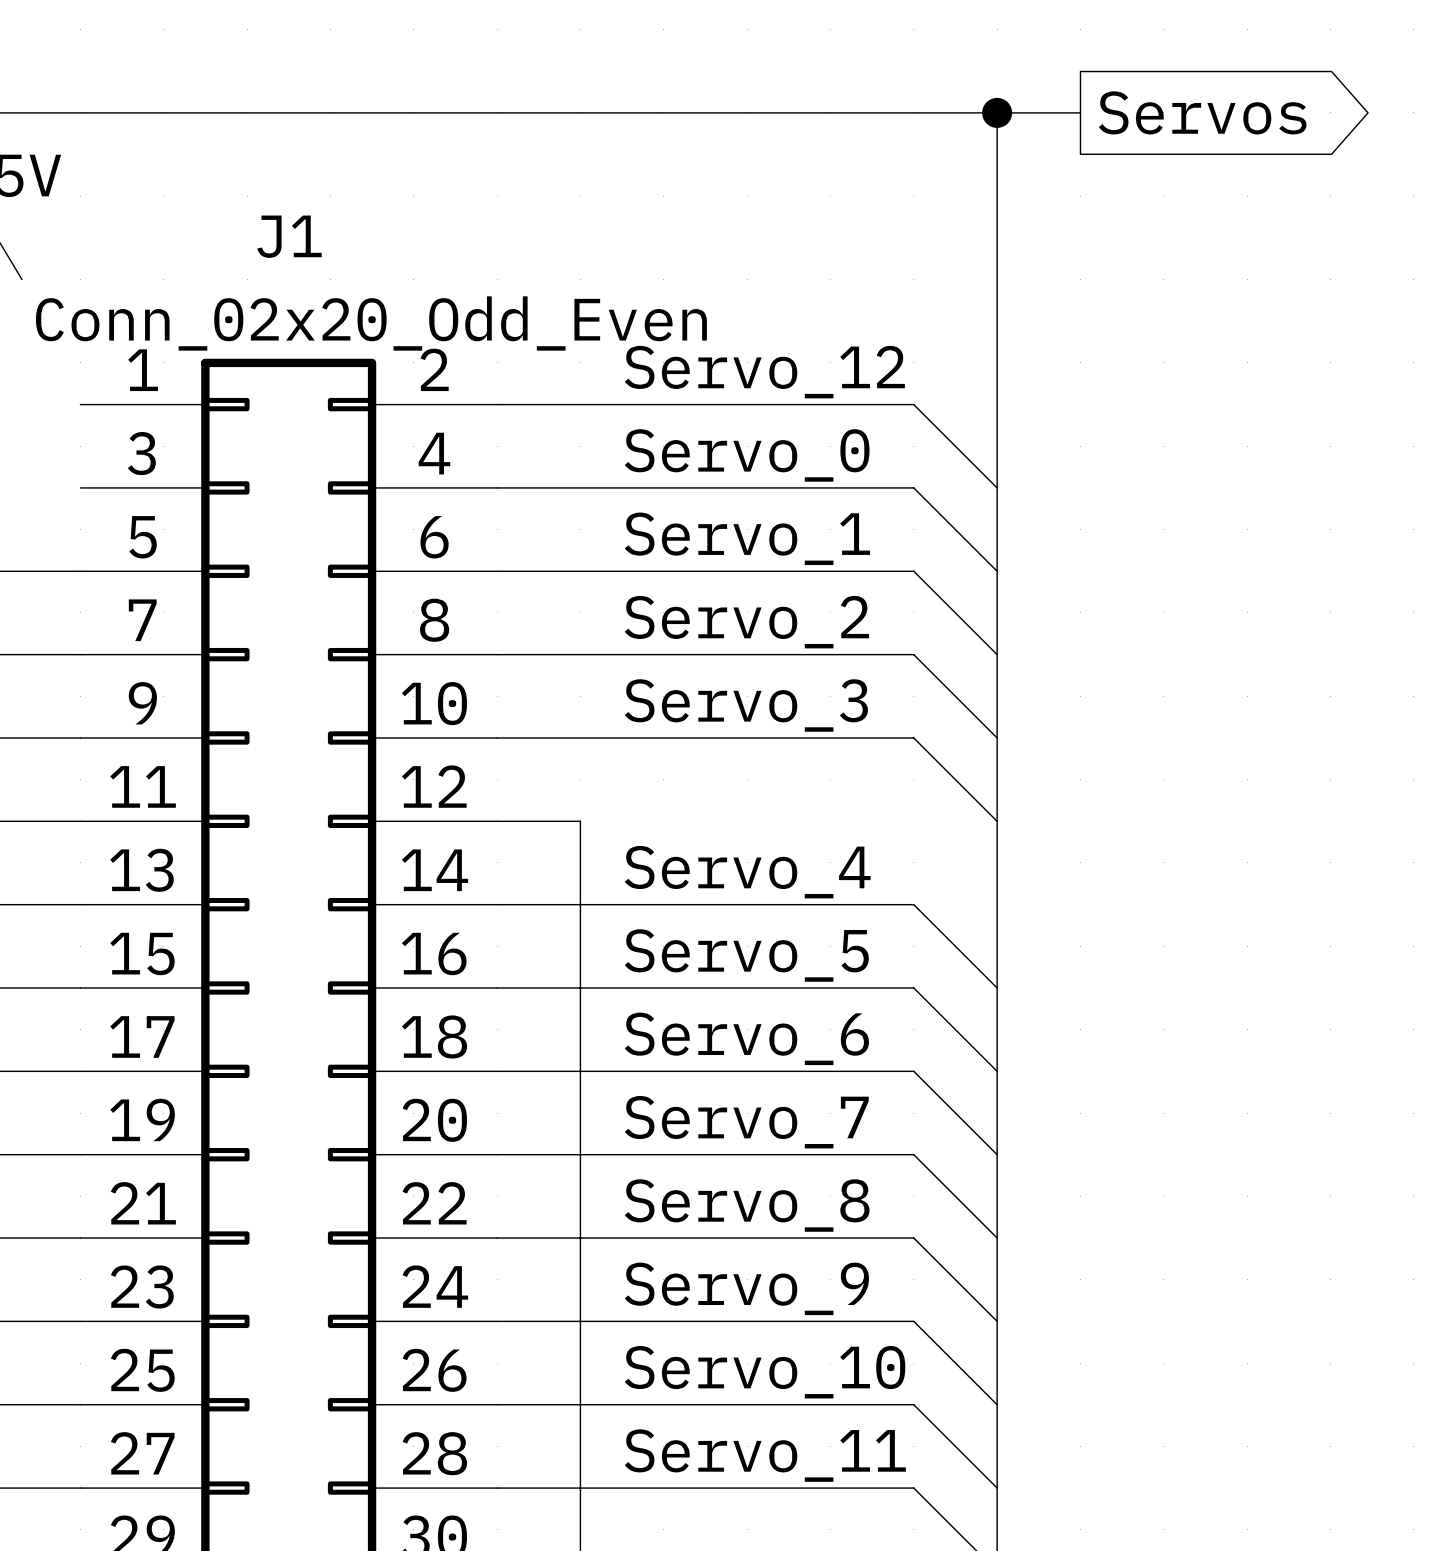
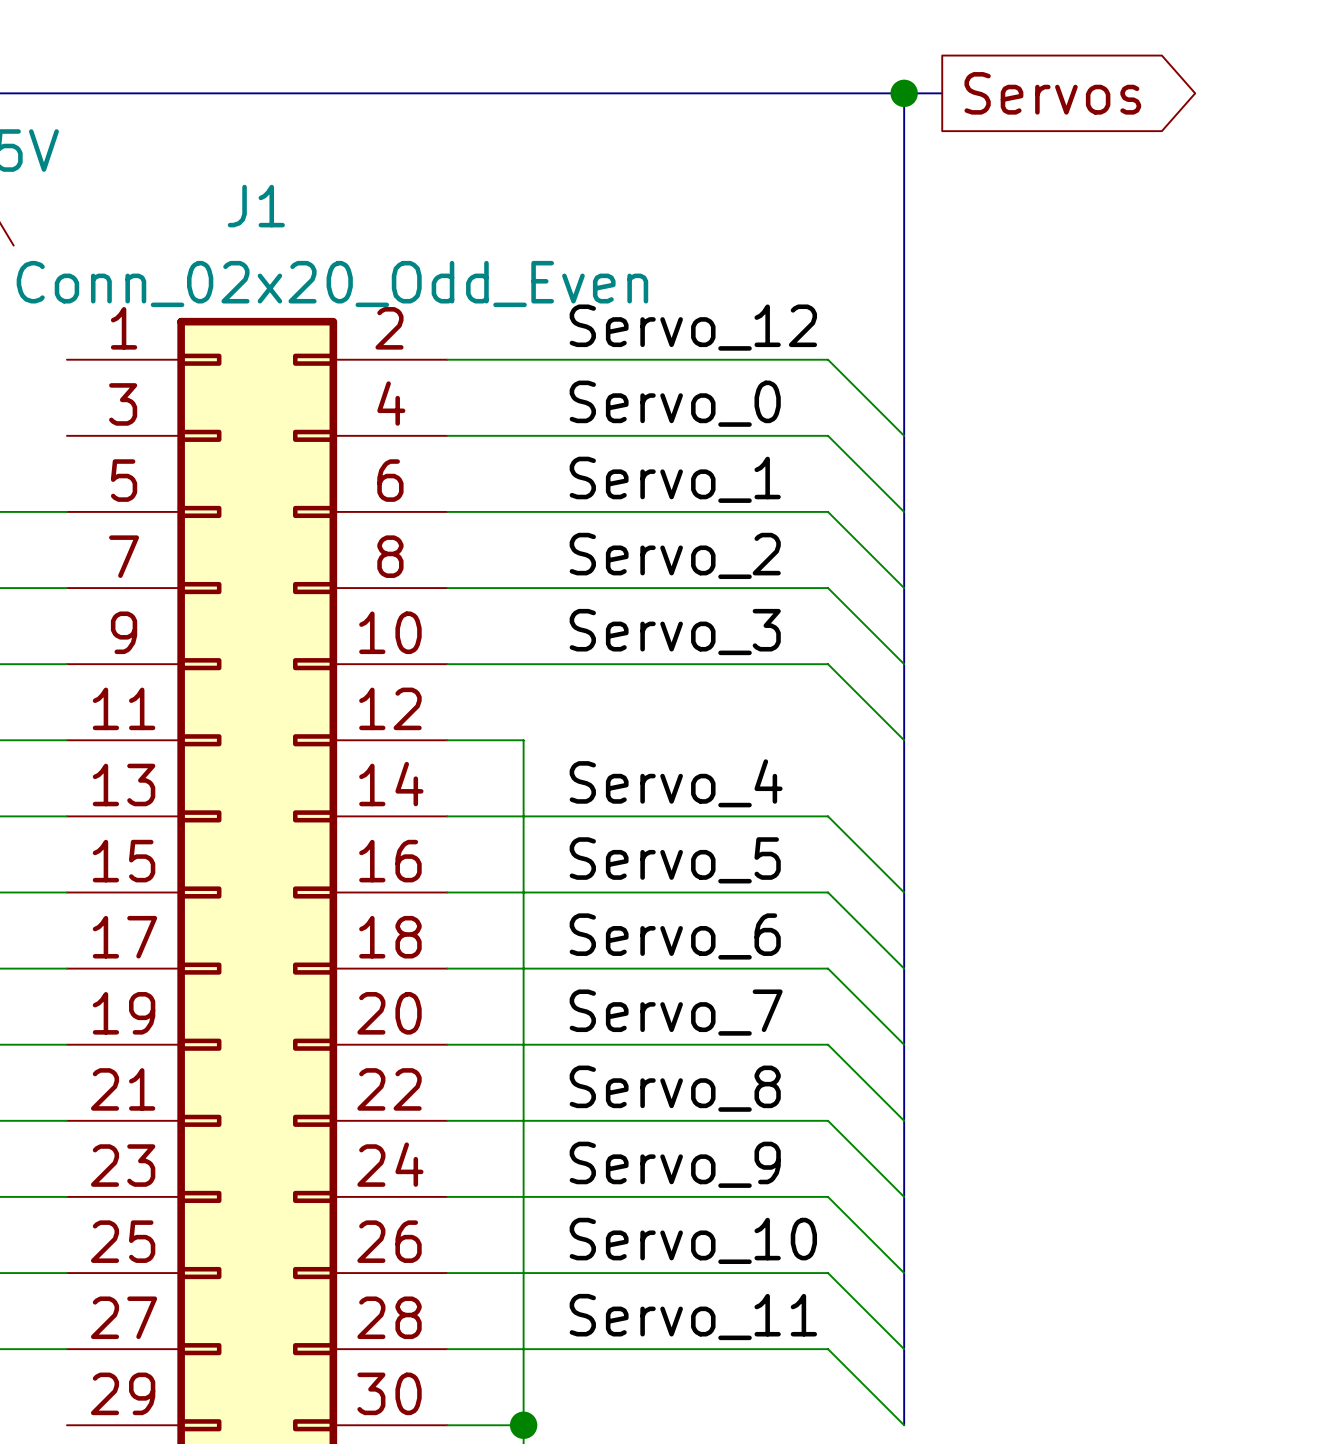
bus: (1038, 112) (1080, 112) -> none
global label position: Servos (1202, 112) -> Servos (1052, 93)

